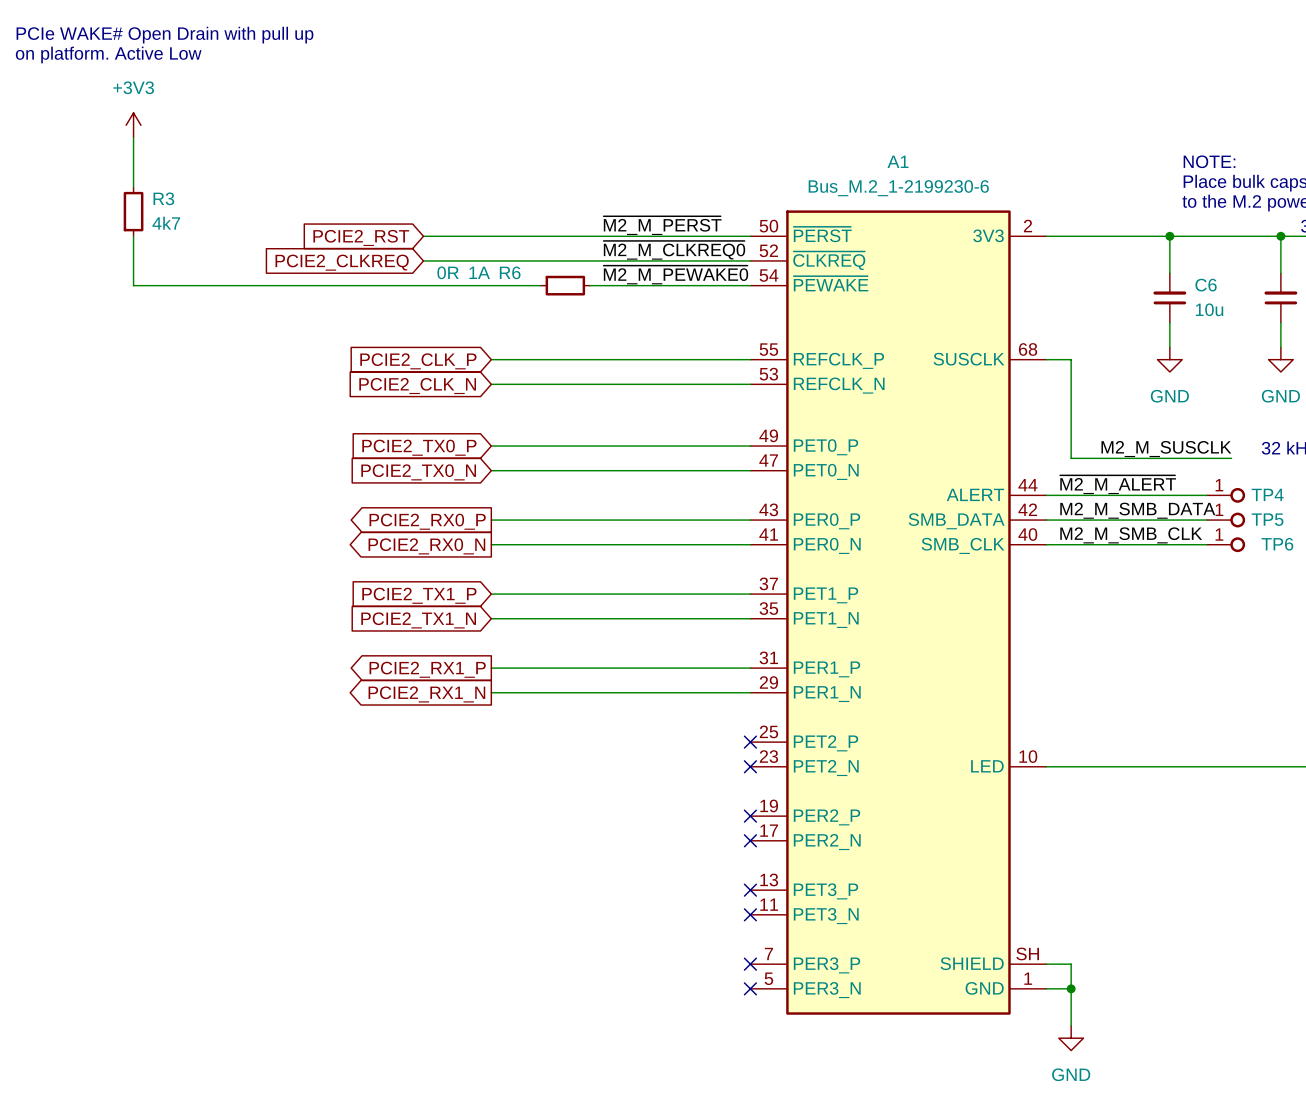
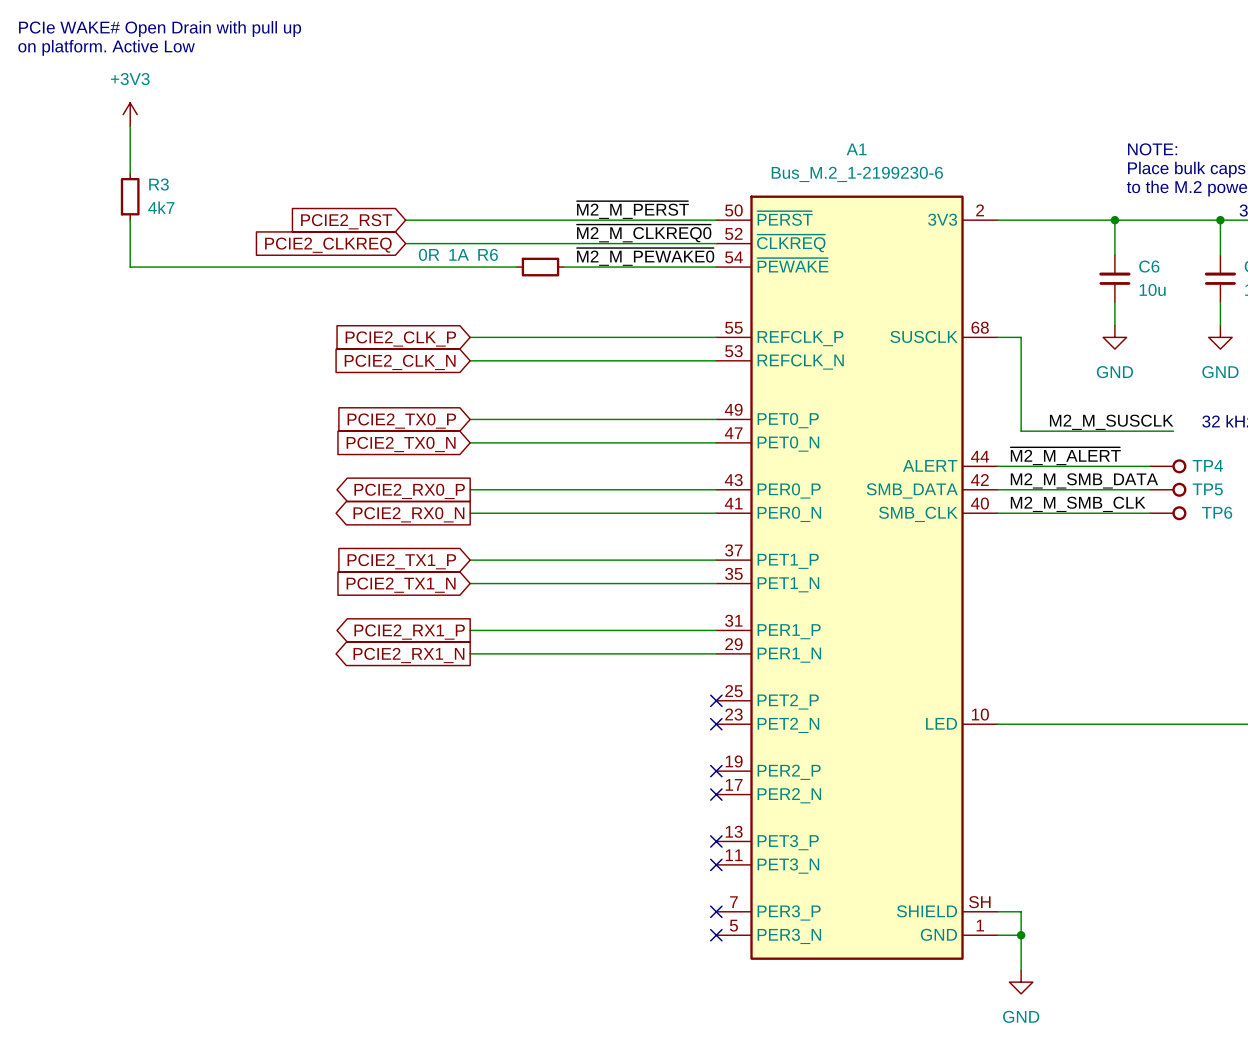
TP4 pin number: 1 (1219, 485) -> none
TP5 pin number: 1 (1219, 509) -> none
TP6 pin number: 1 (1219, 534) -> none

